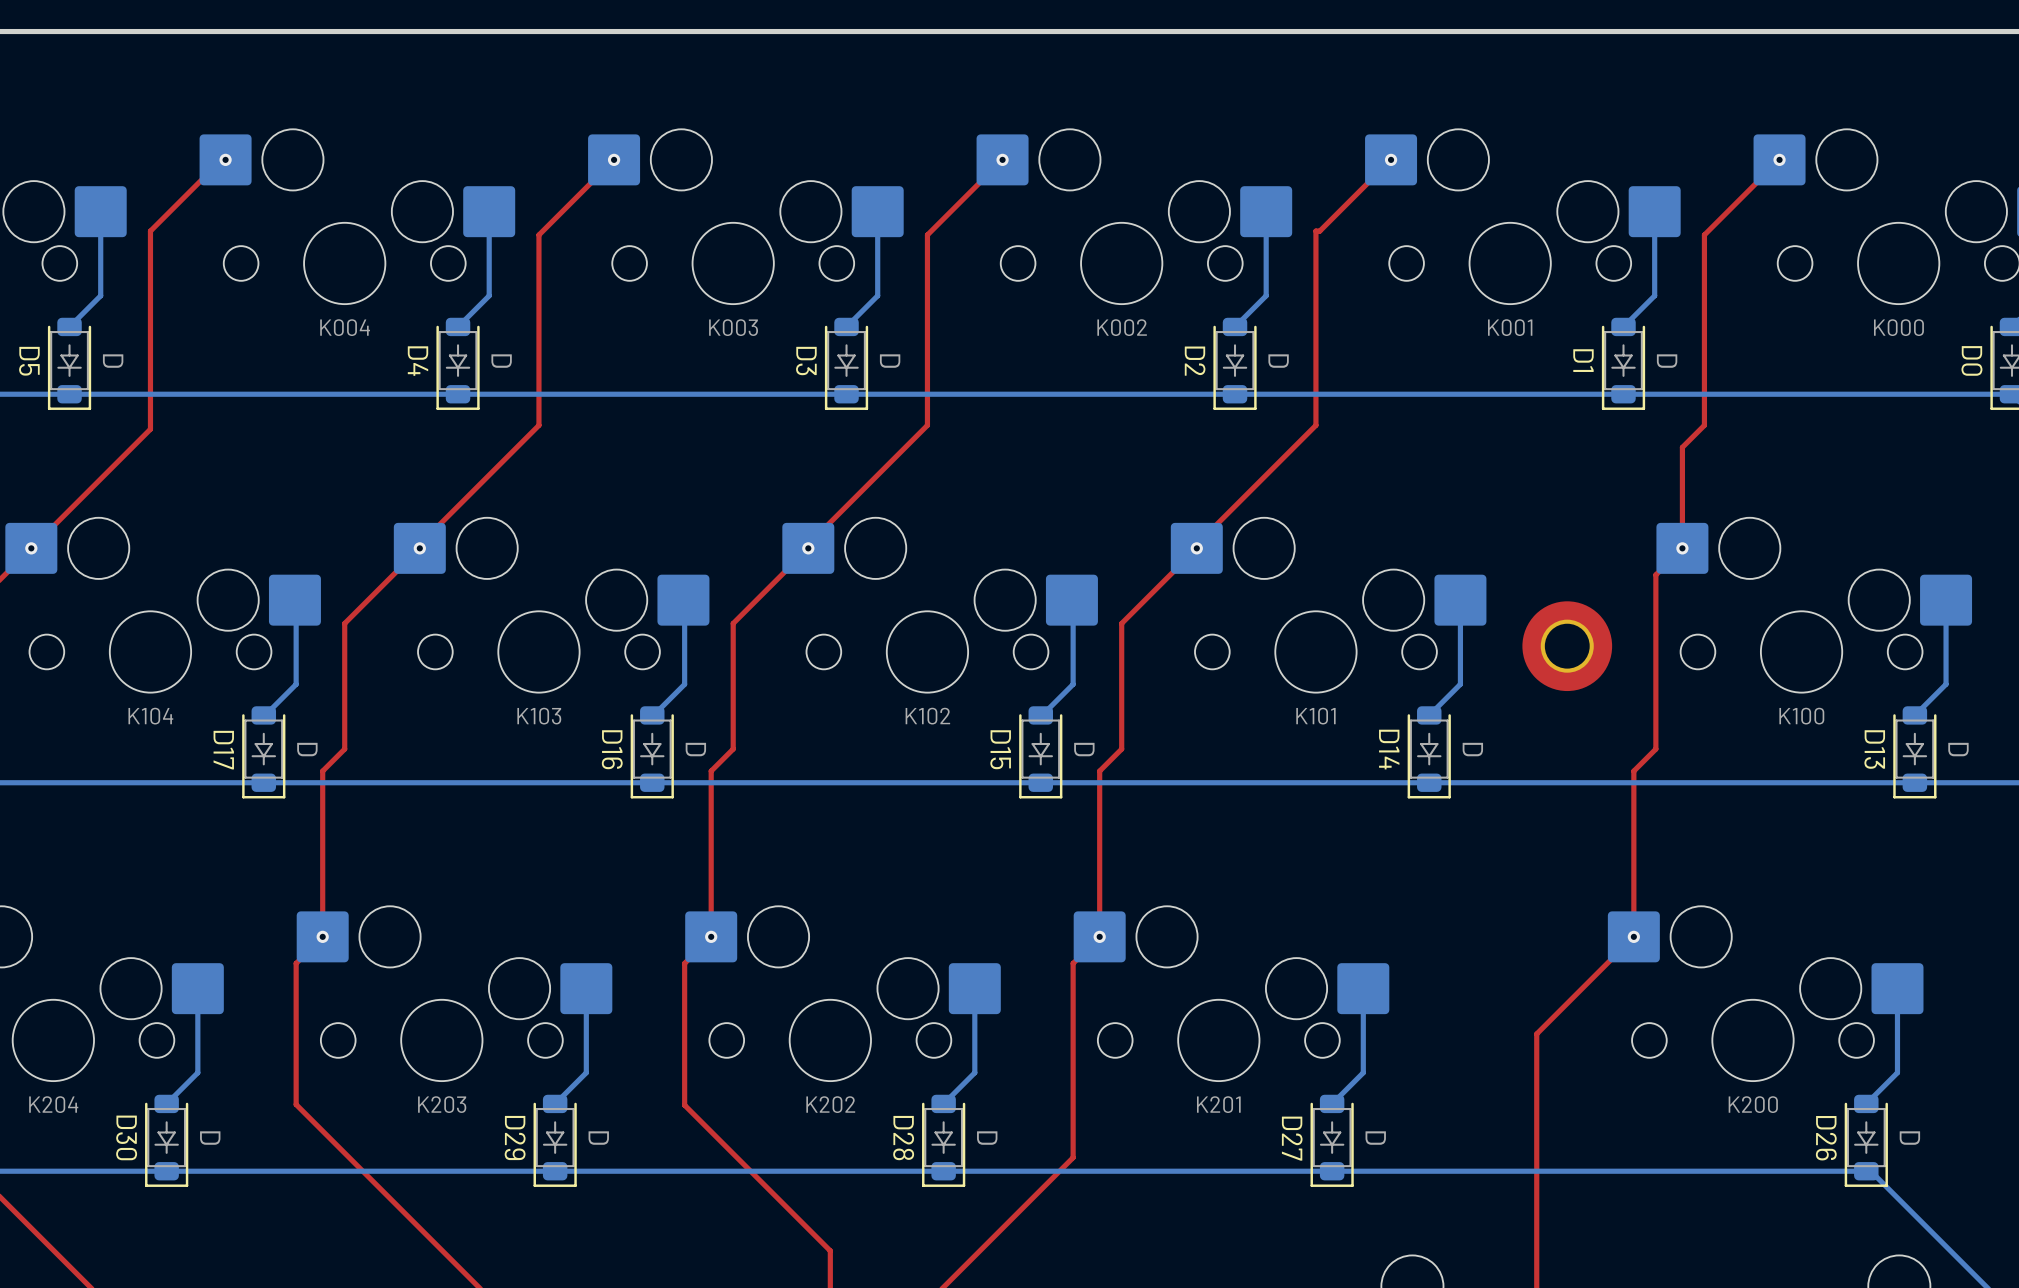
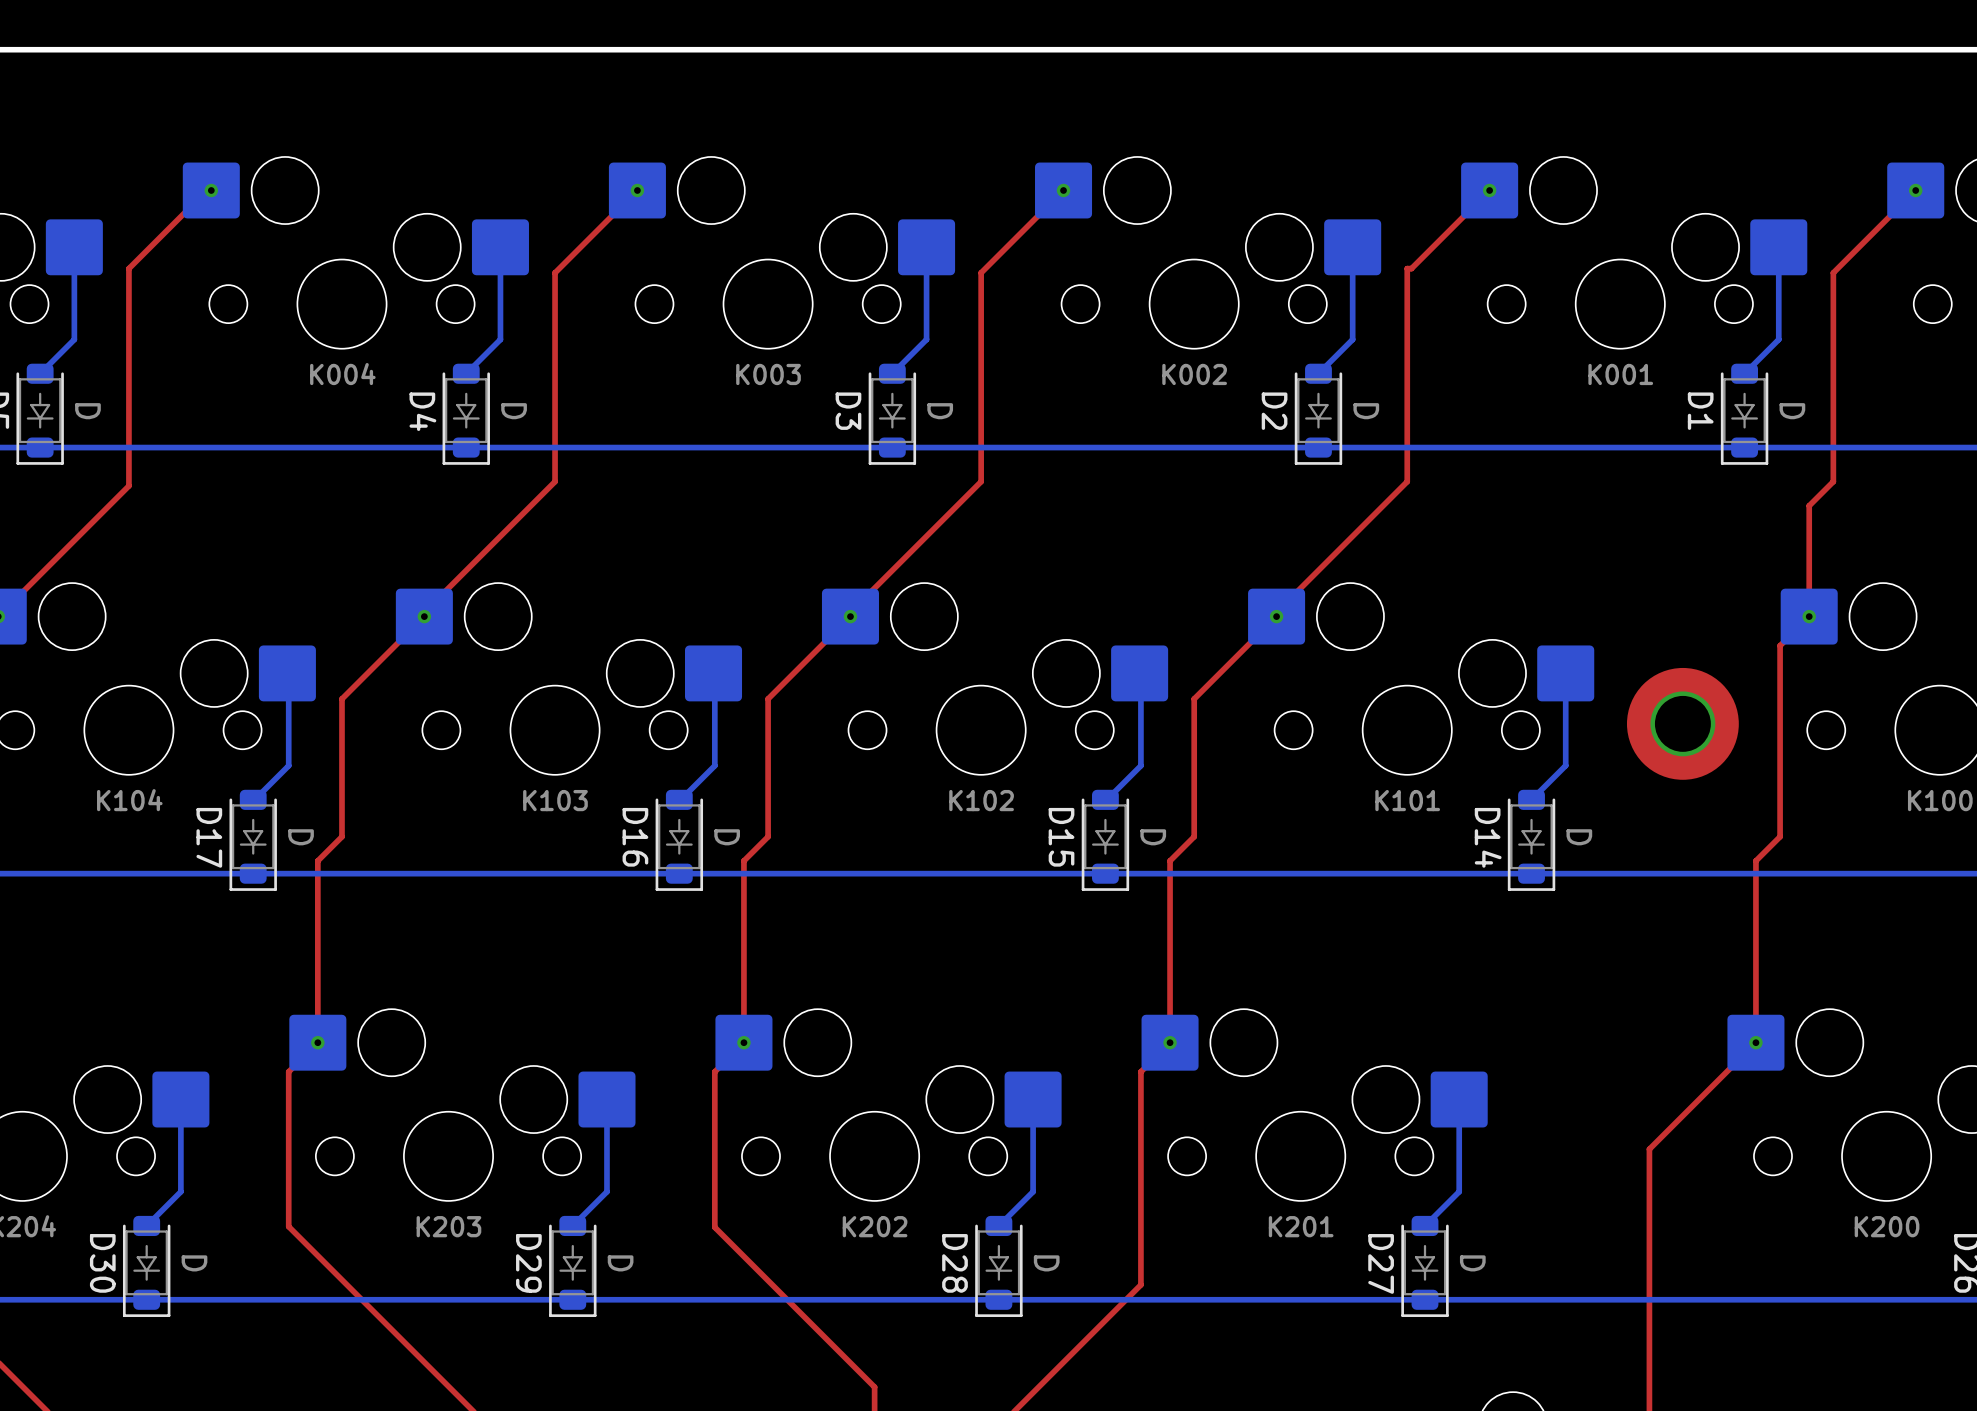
part footprint: [1522, 601, 1613, 692] -> [1626, 667, 1739, 780]

